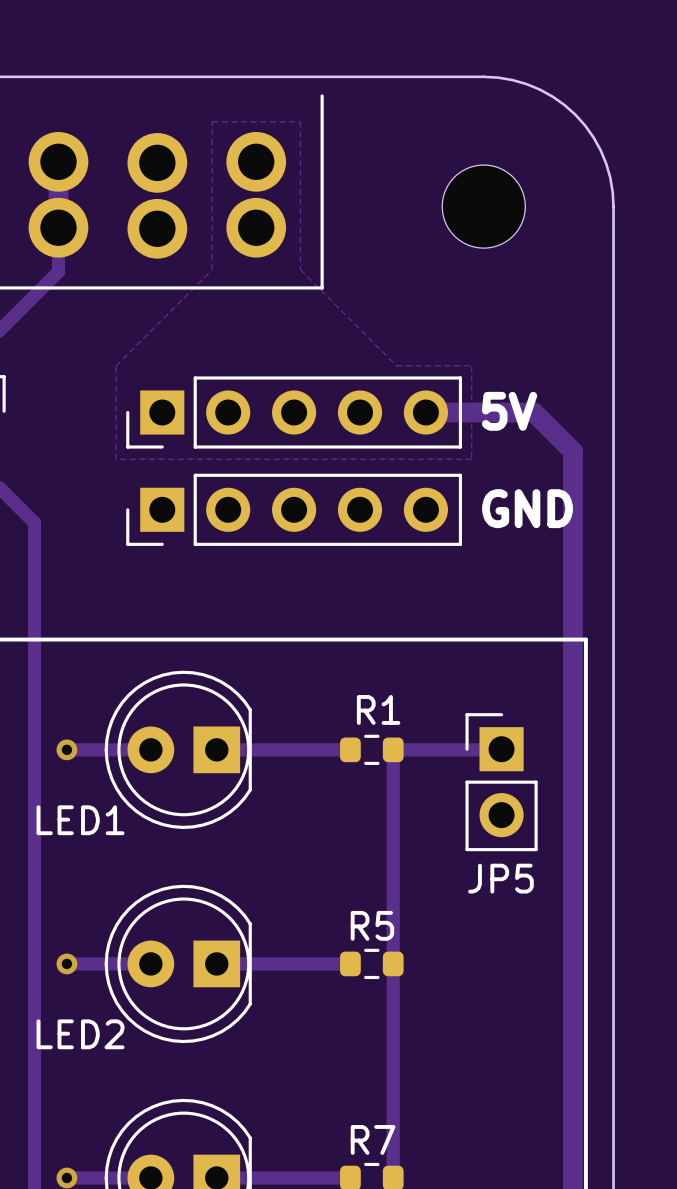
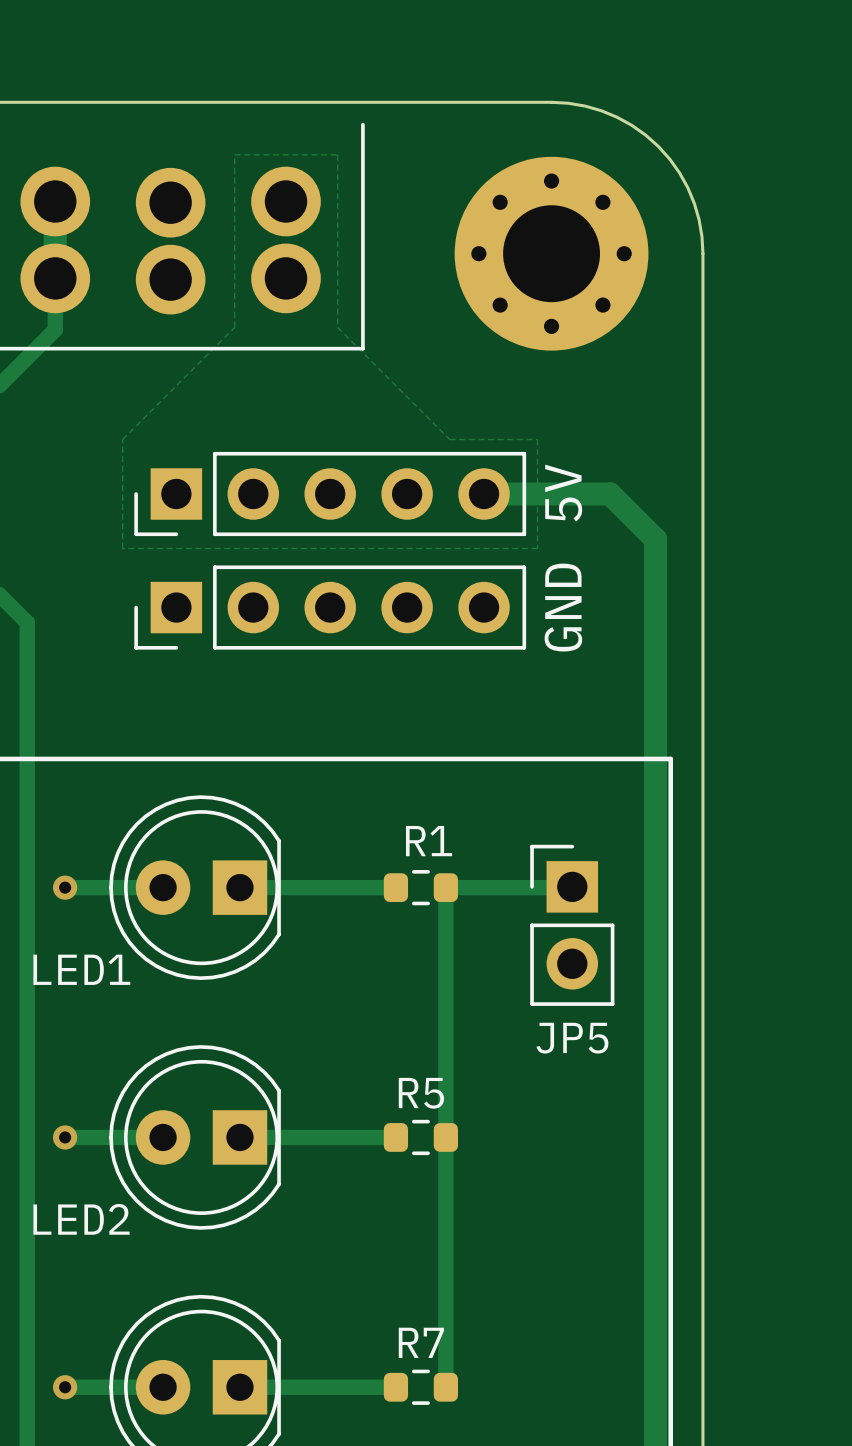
part footprint: [442, 165, 526, 249] -> [454, 156, 649, 351]
text rotation: 0° (509, 411) -> 90° counterclockwise (563, 493)
text rotation: 0° (527, 508) -> 90° counterclockwise (563, 607)

